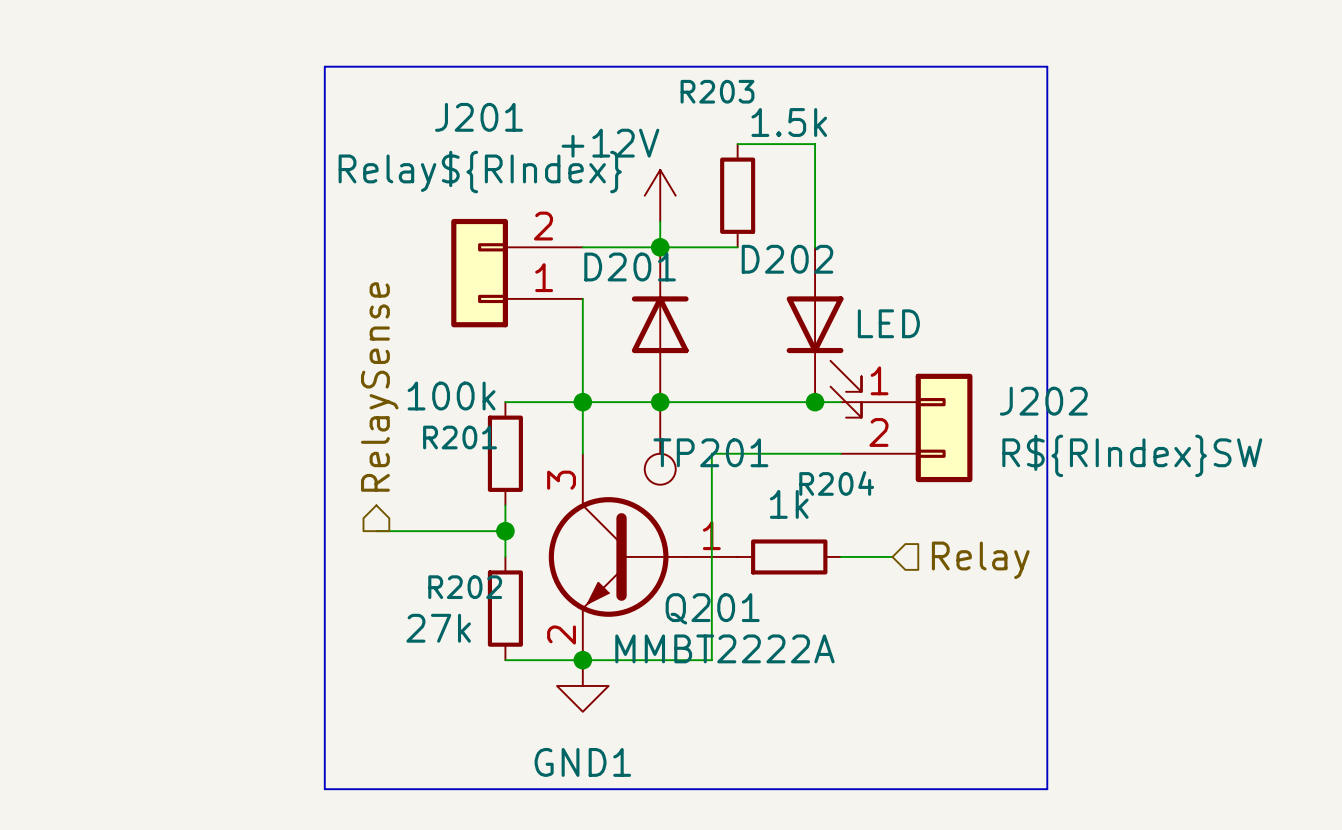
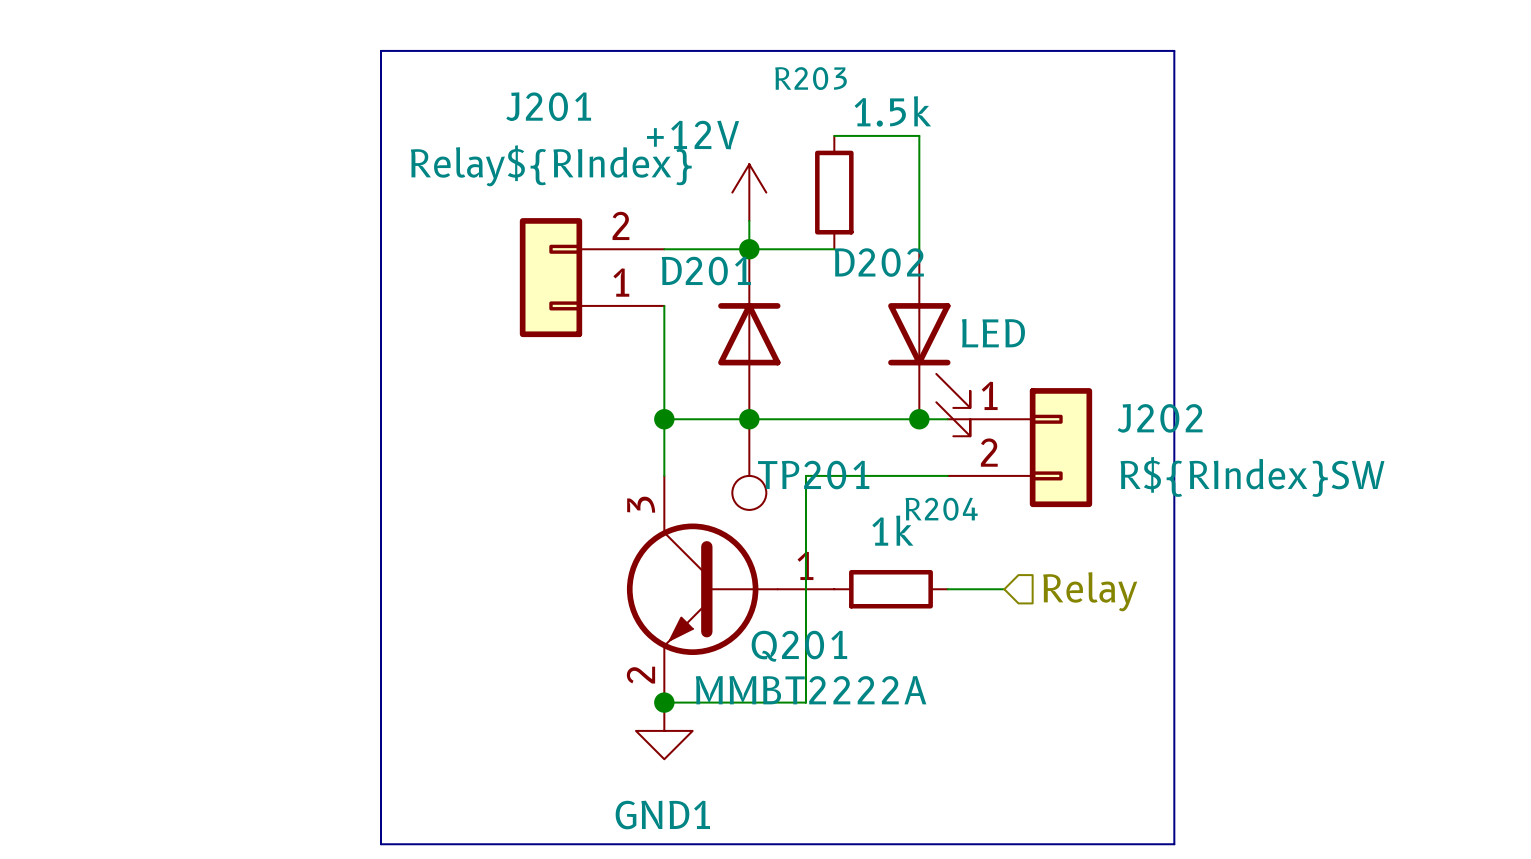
hierarchical label: RelaySense (379, 387) -> none
wire: (505, 402) (582, 402) -> none
R201: 100k (505, 453) -> none
wire: (505, 505) (505, 556) -> none
wire: (376, 531) (505, 531) -> none
junction: (505, 531) -> none
R202: 27k (505, 608) -> none
wire: (505, 660) (582, 660) -> none

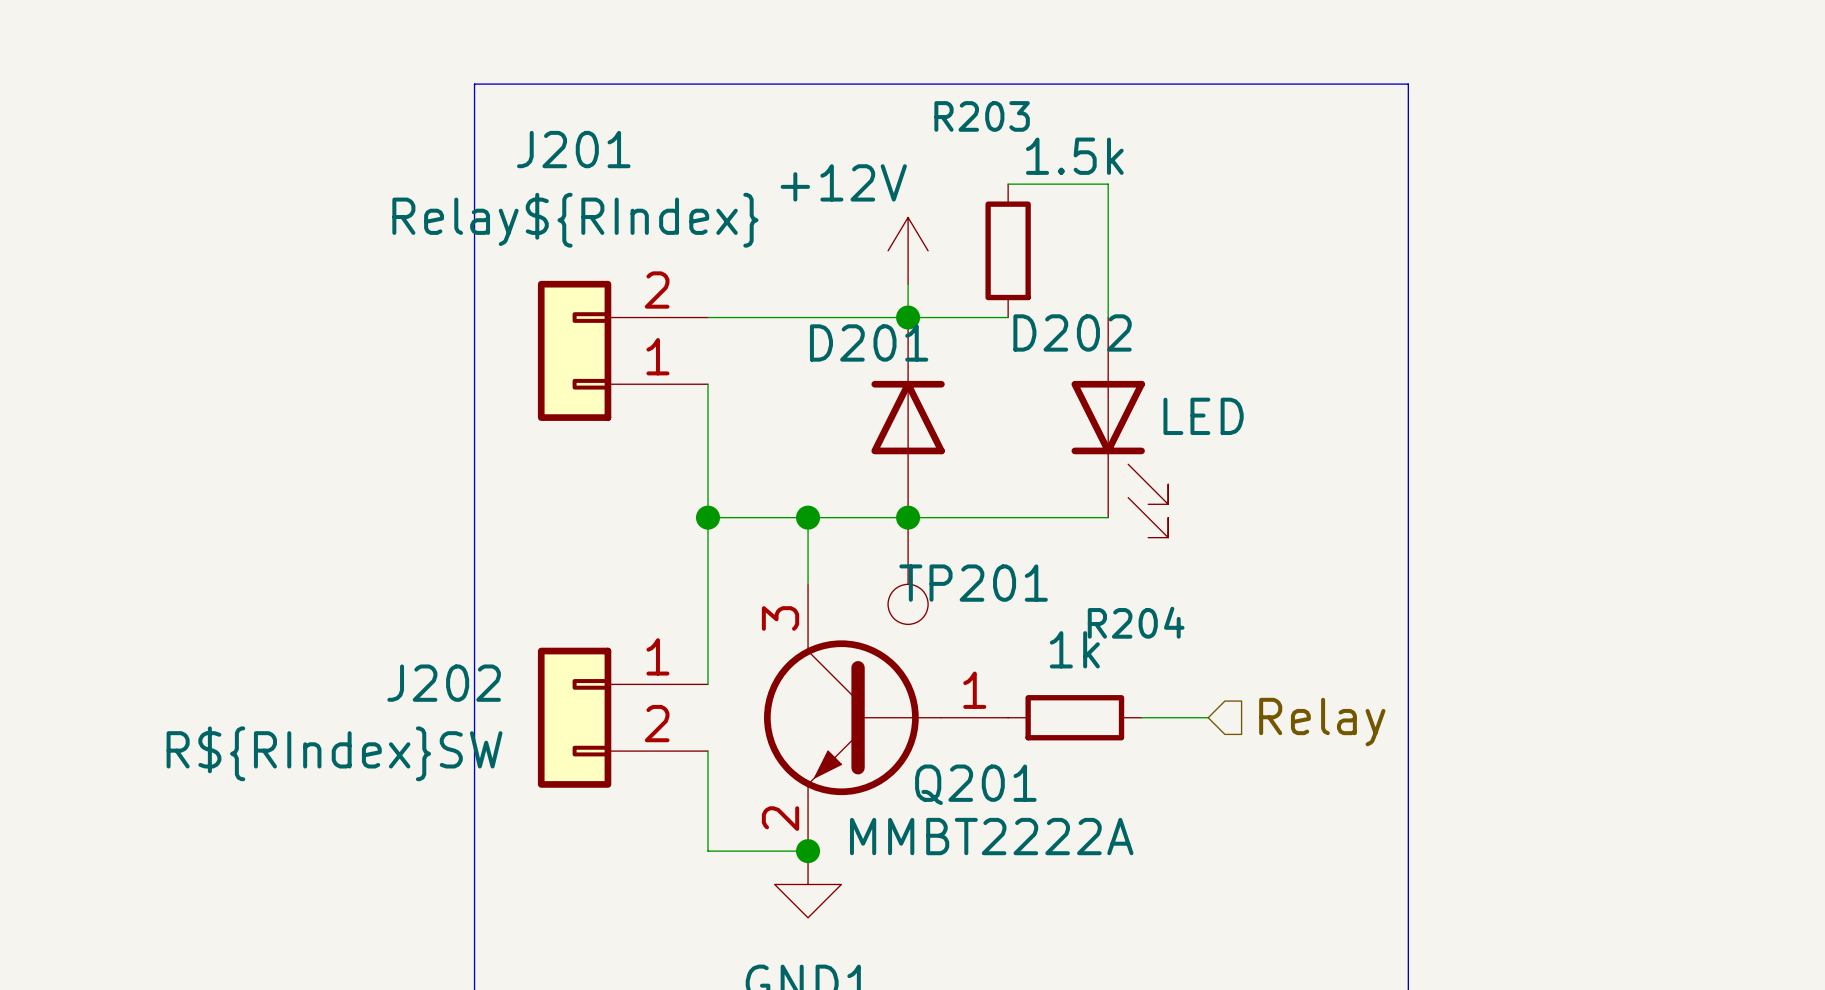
J201 position: (592, 277) -> (622, 350)
wire: none -> (707, 384) (707, 684)
wire: (664, 305) (664, 419) -> (707, 517) (808, 517)
junction: none -> (707, 517)
wire: (919, 419) (947, 419) -> none
junction: (919, 419) -> none
J202 position: (1019, 447) -> (622, 717)
J202 flip: as is (1060, 447) -> left-right (574, 717)
wire: (947, 475) (805, 475) (805, 702) (664, 702) -> (707, 751) (707, 851) (808, 851)

